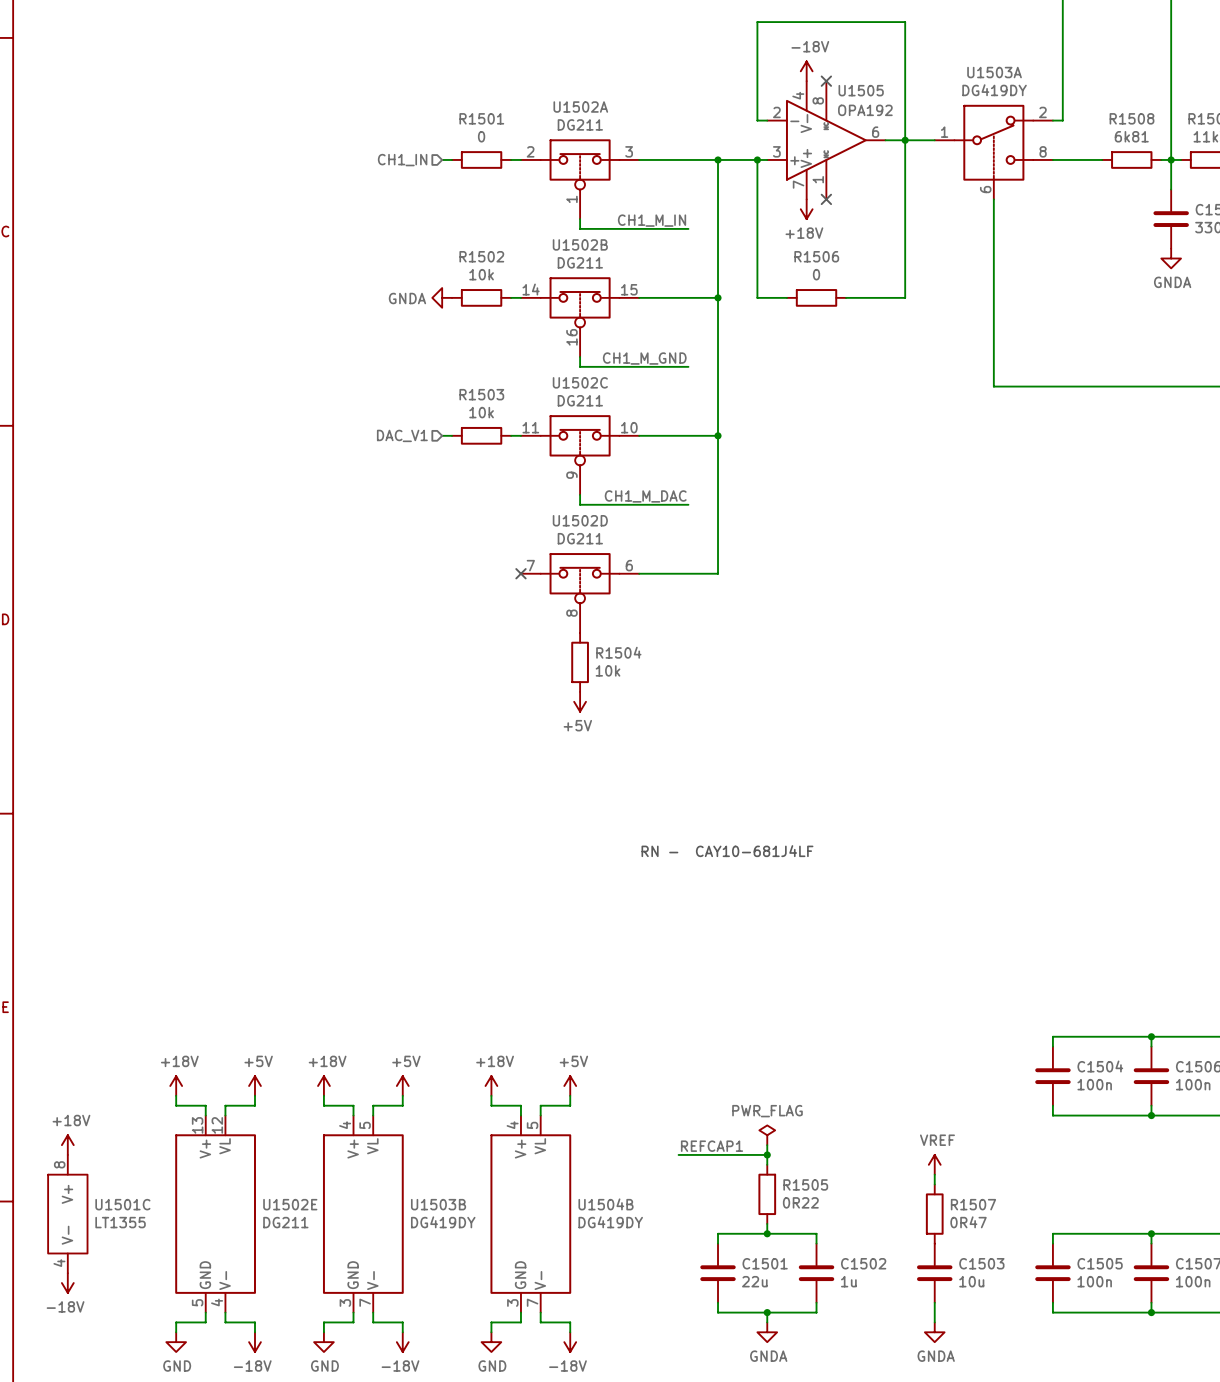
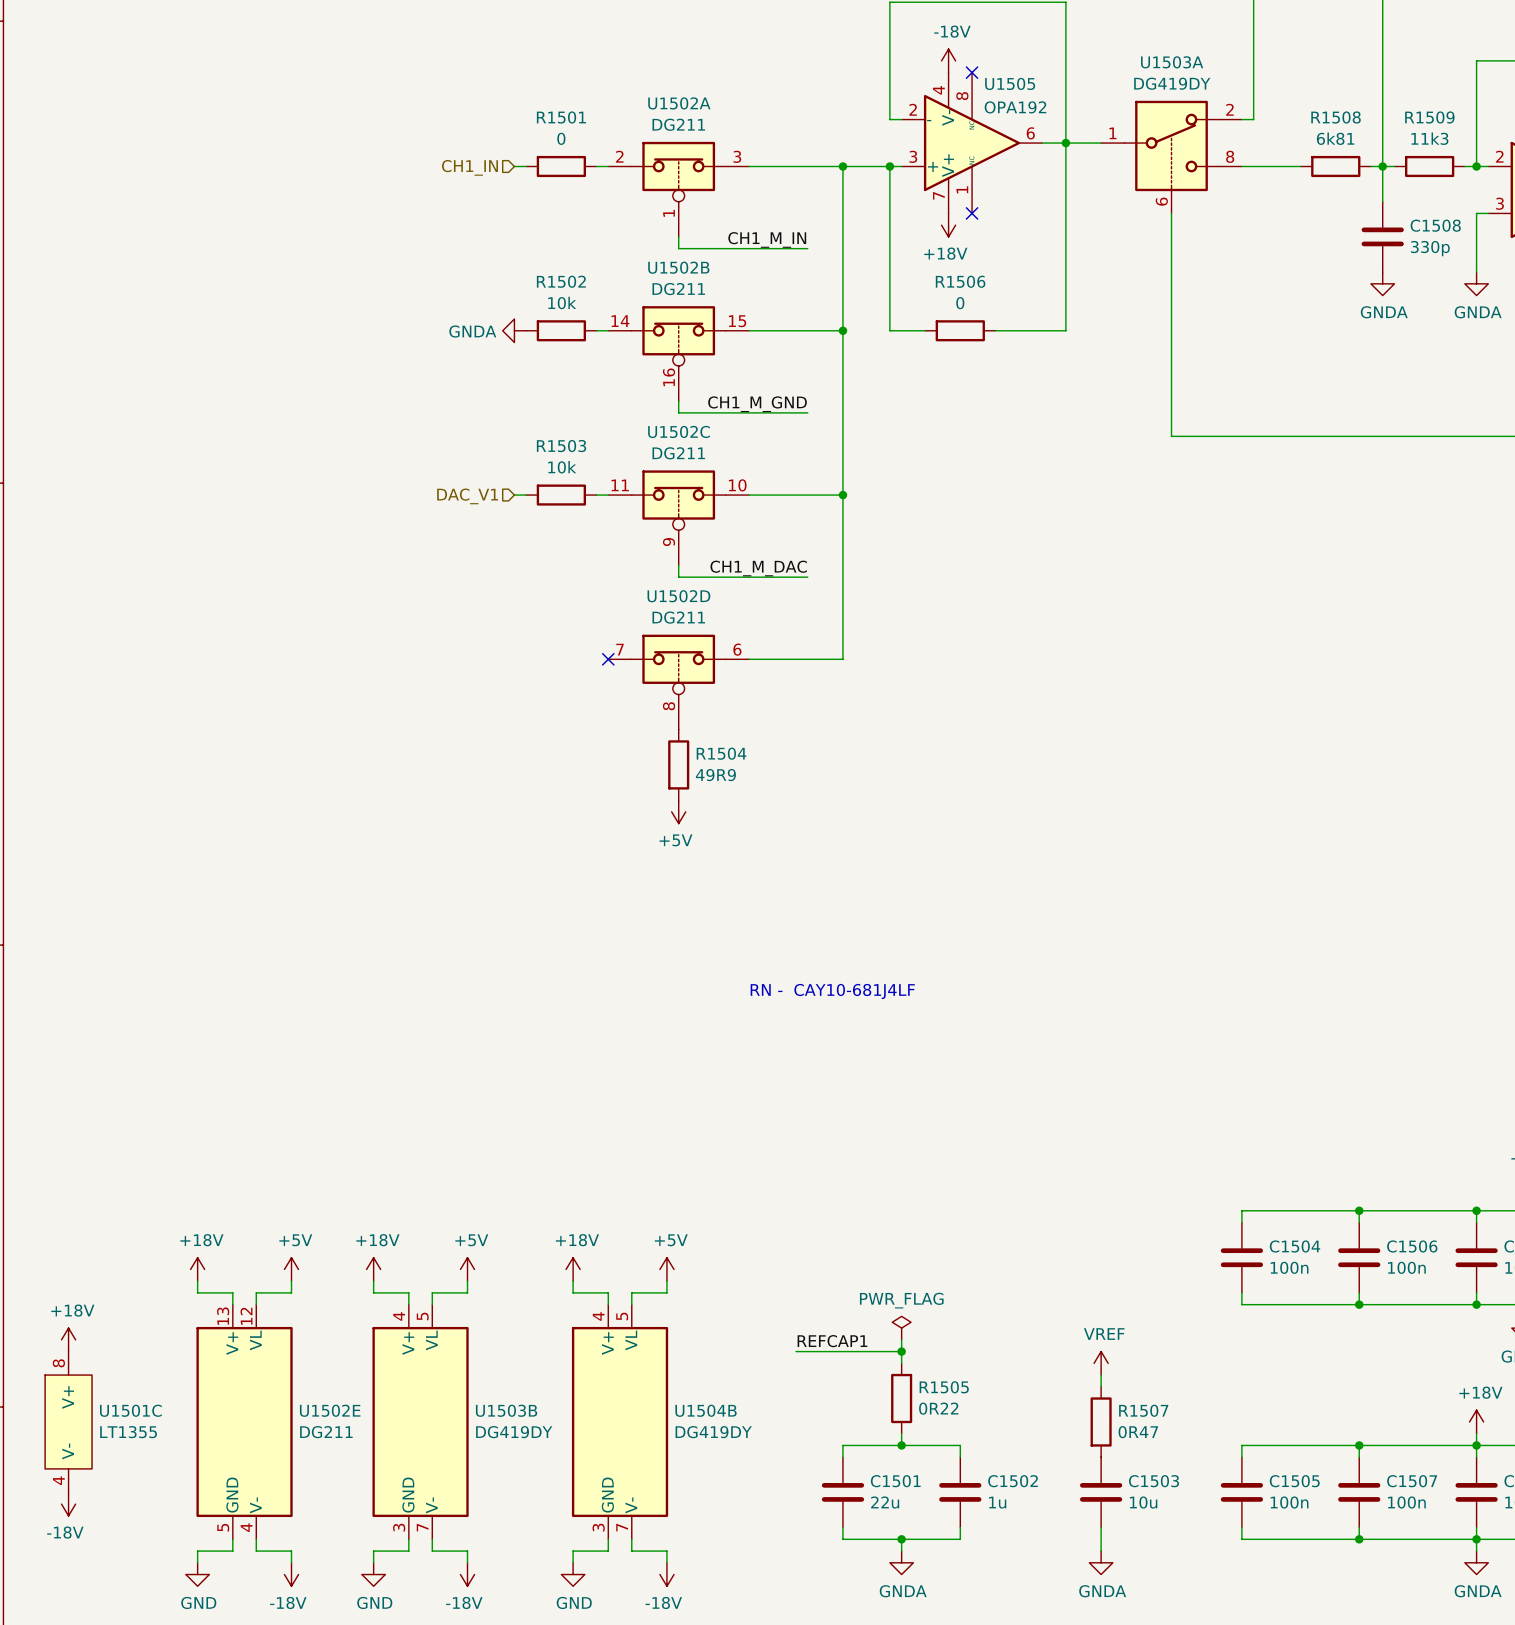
R1504 value: 10k (608, 670) -> 49R9 (715, 775)

